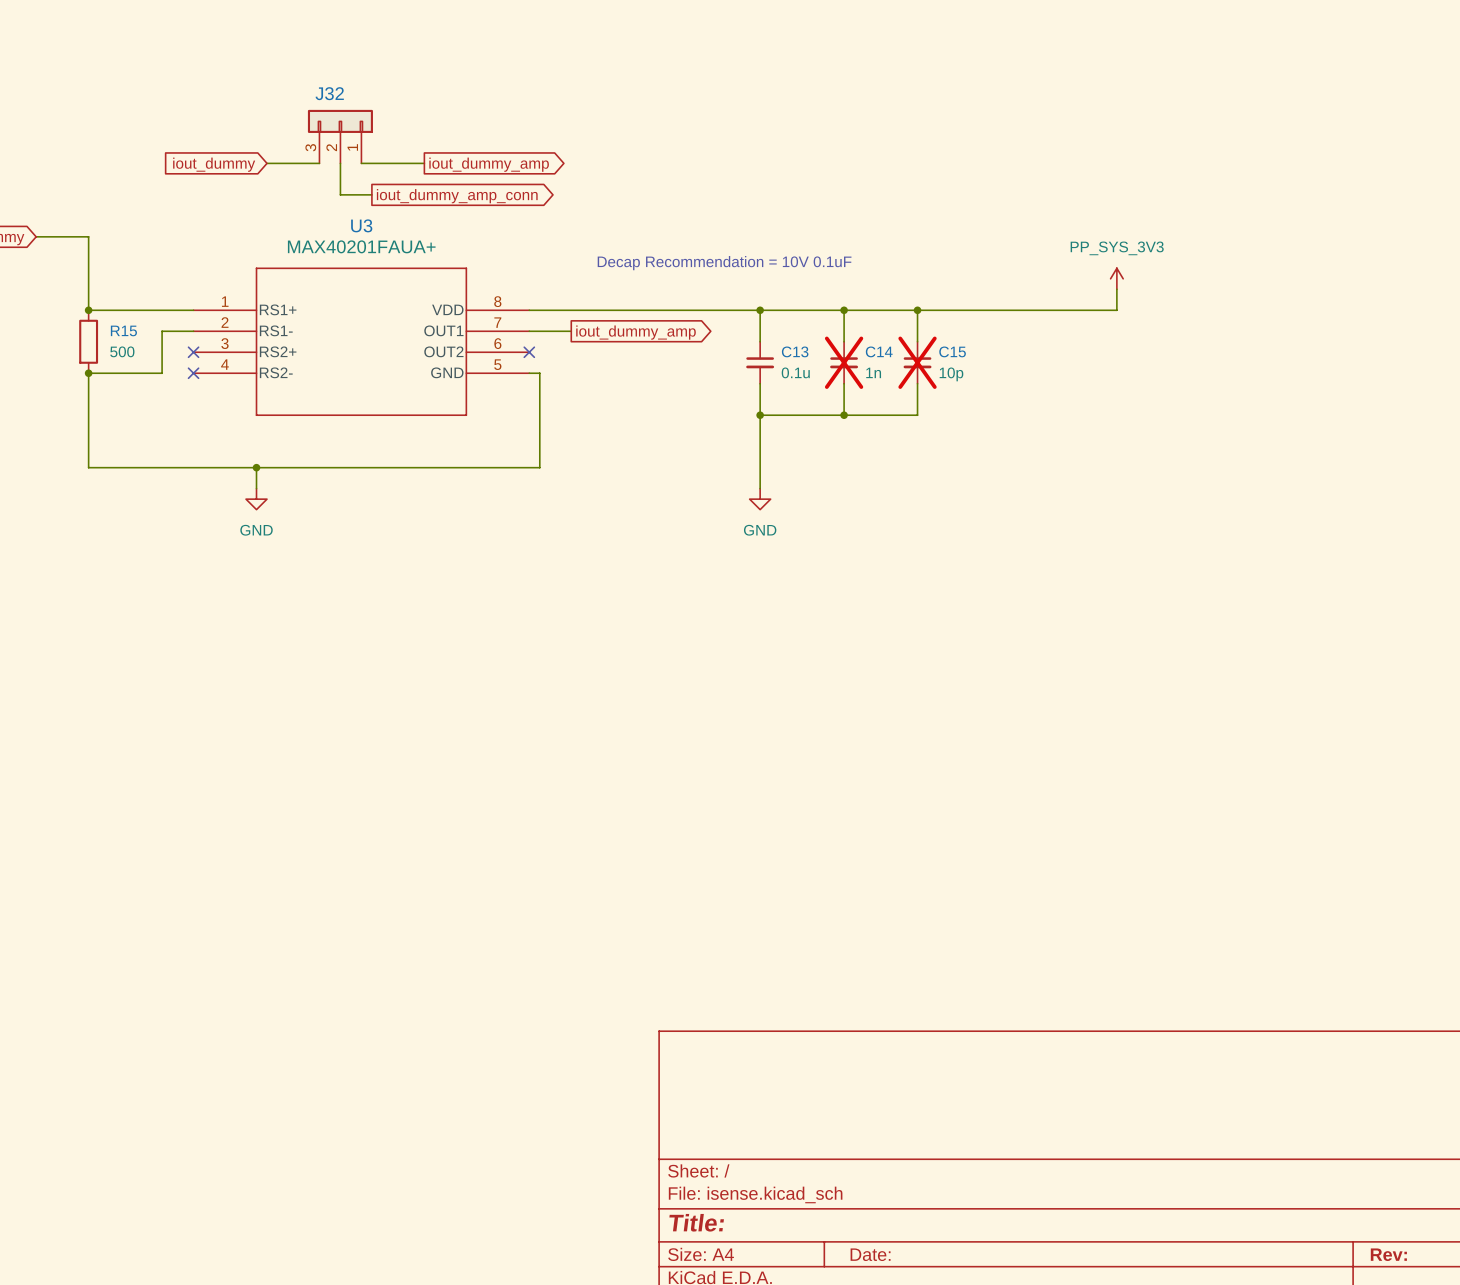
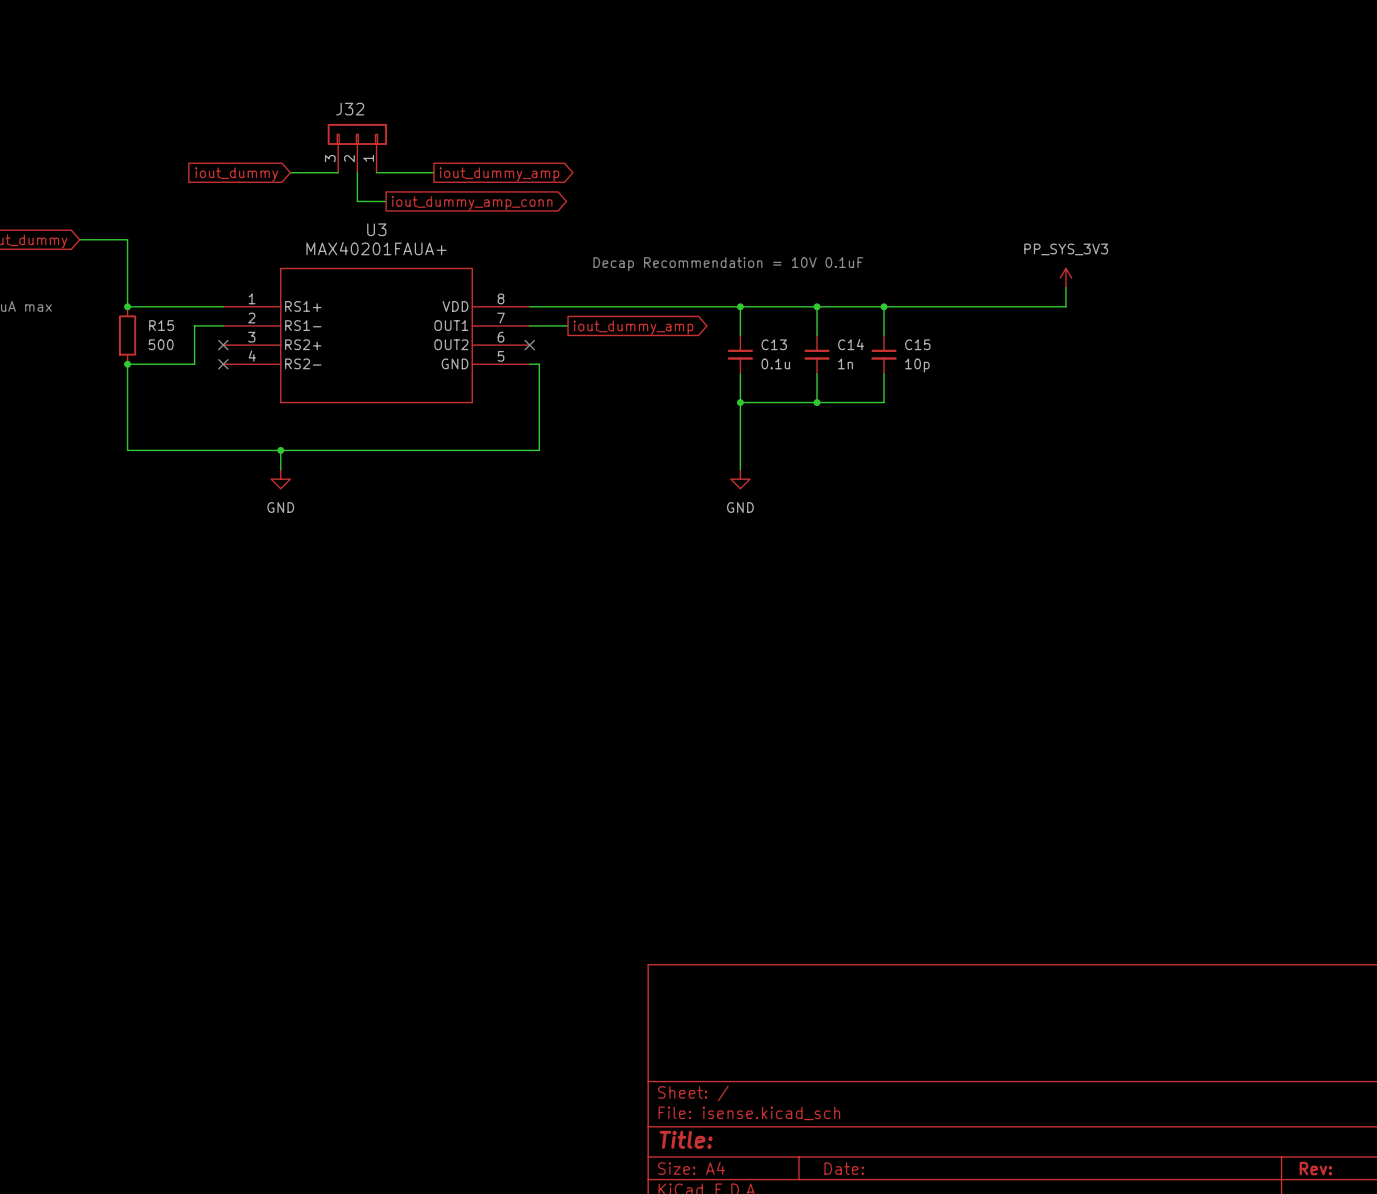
C14 do-not-place cross: (844, 362) -> none
C15 do-not-place cross: (917, 362) -> none

